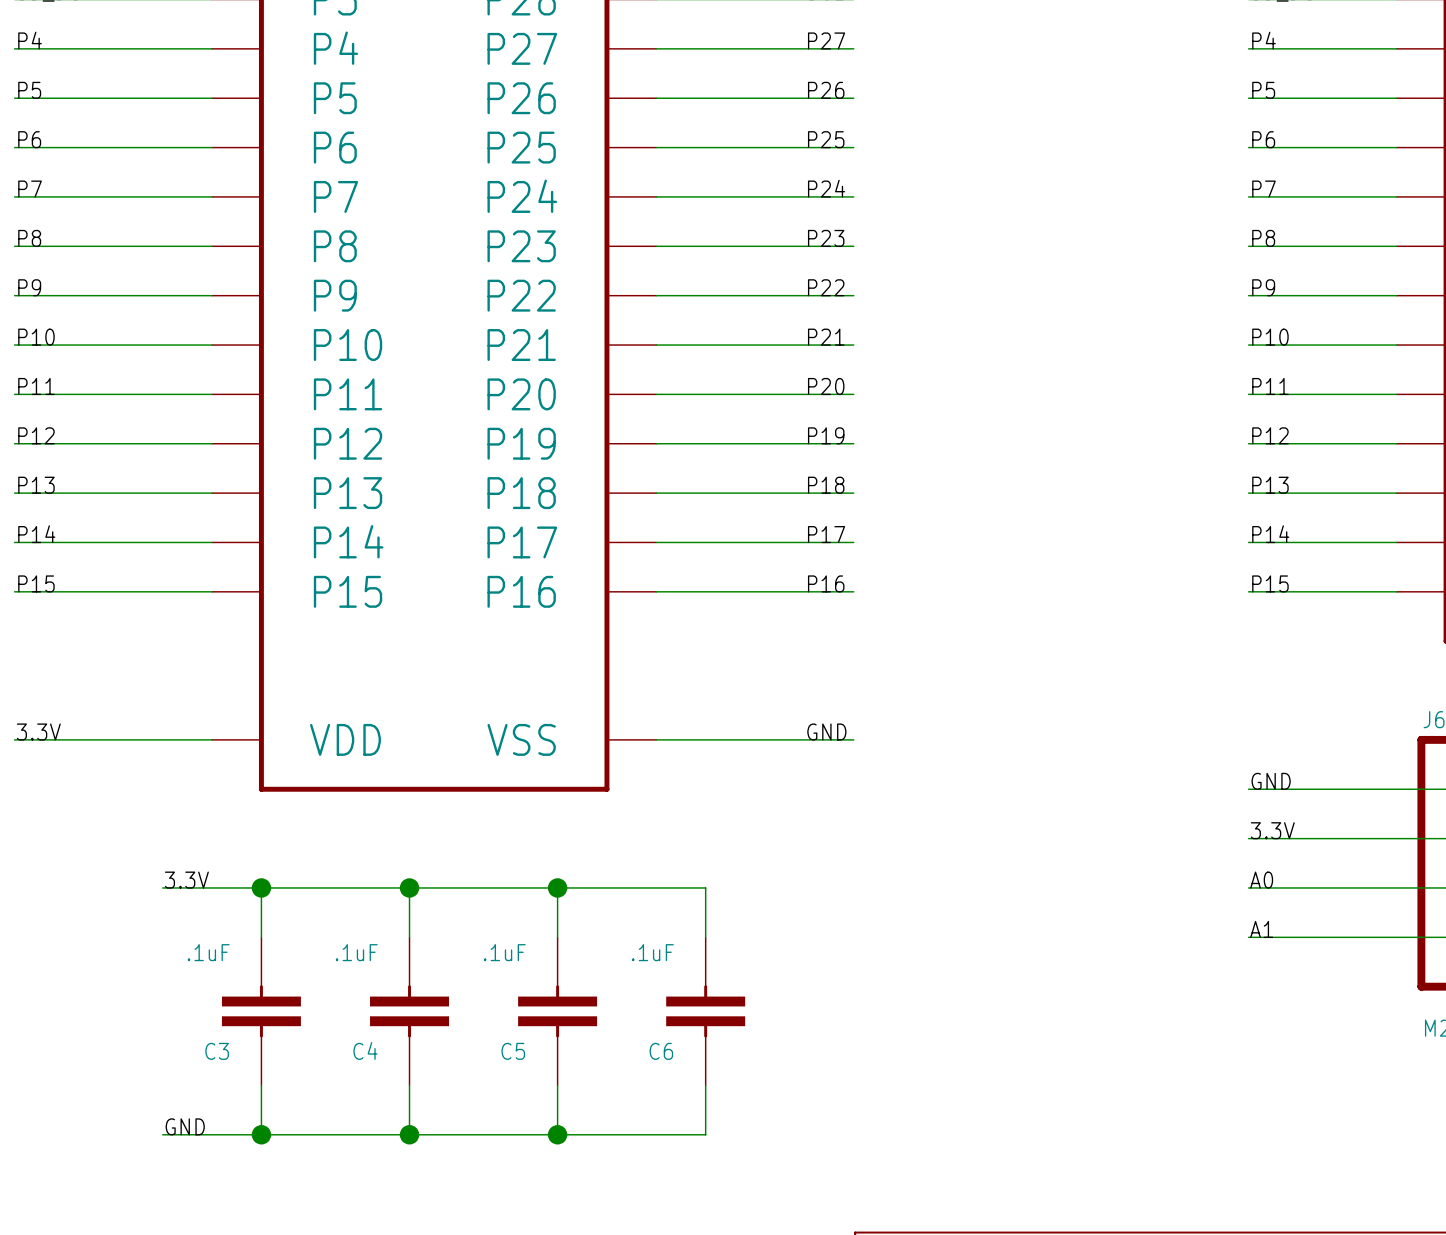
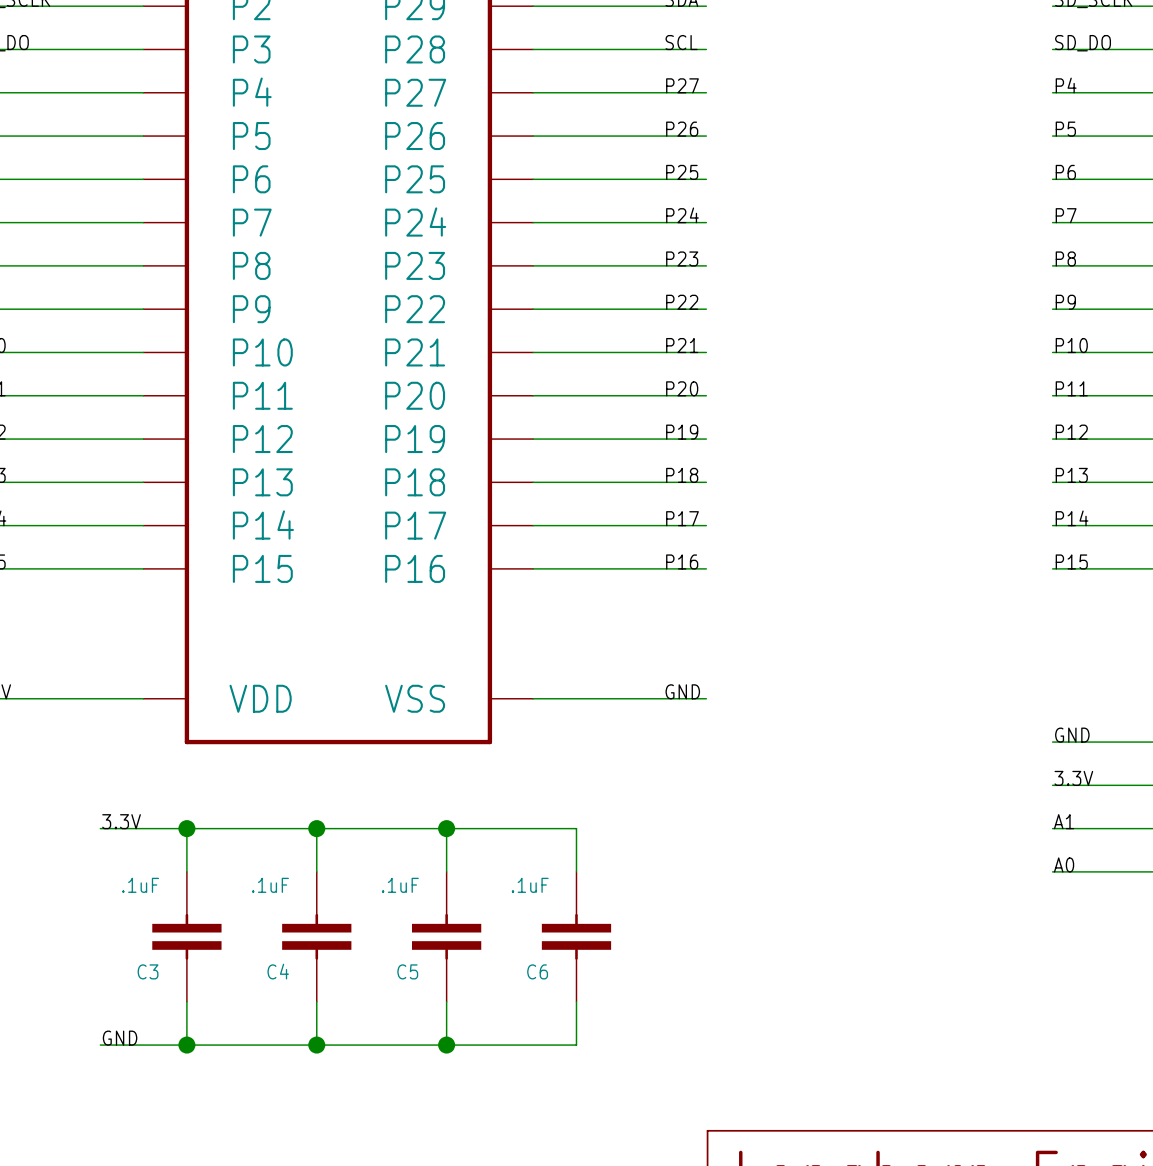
label: A0 (1261, 880) -> A1 (1064, 821)
label: A1 (1261, 929) -> A0 (1064, 864)

